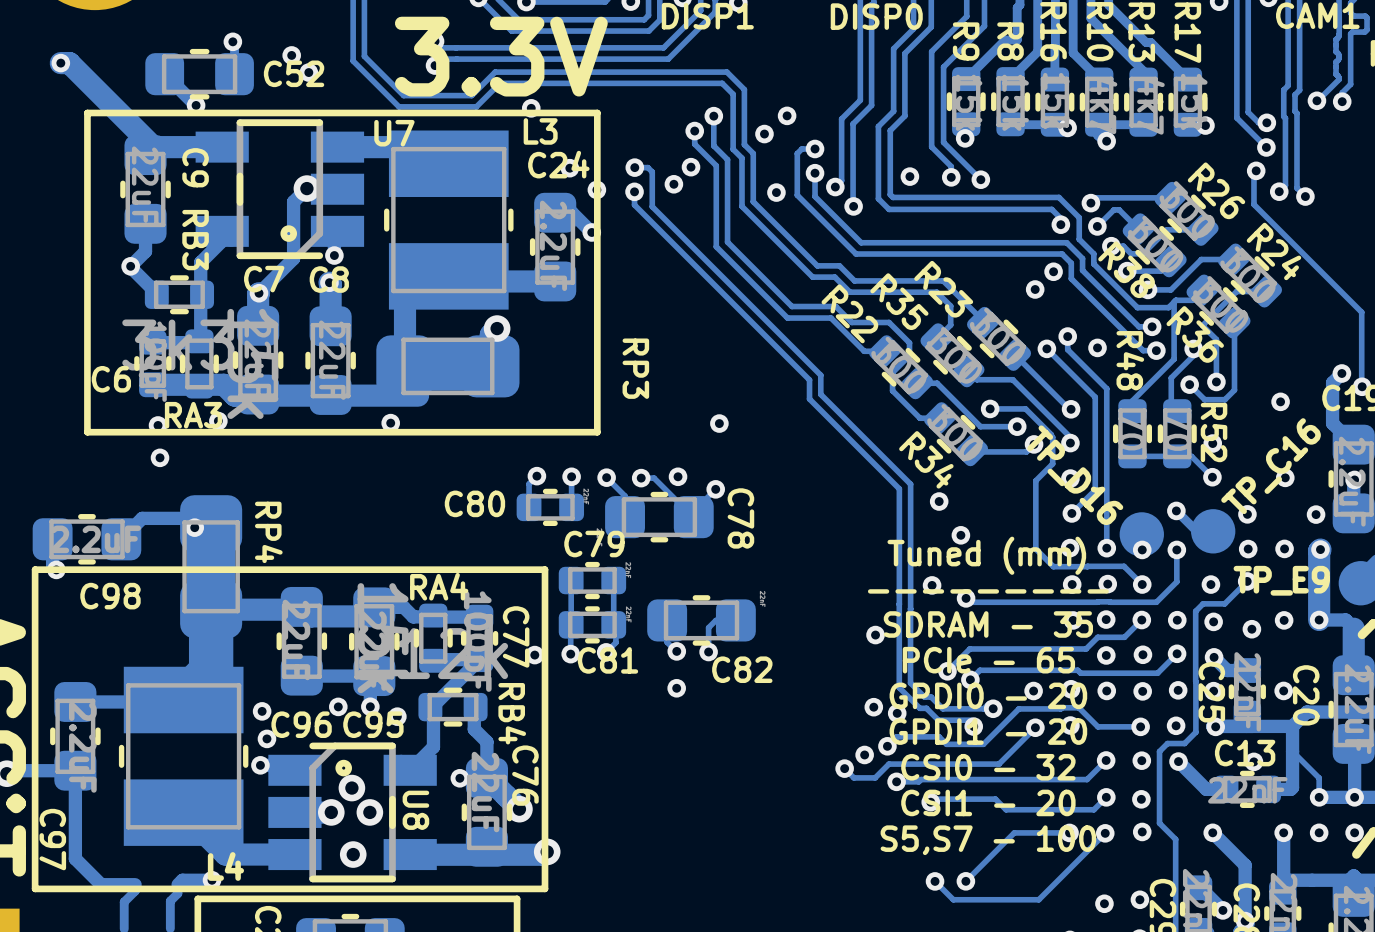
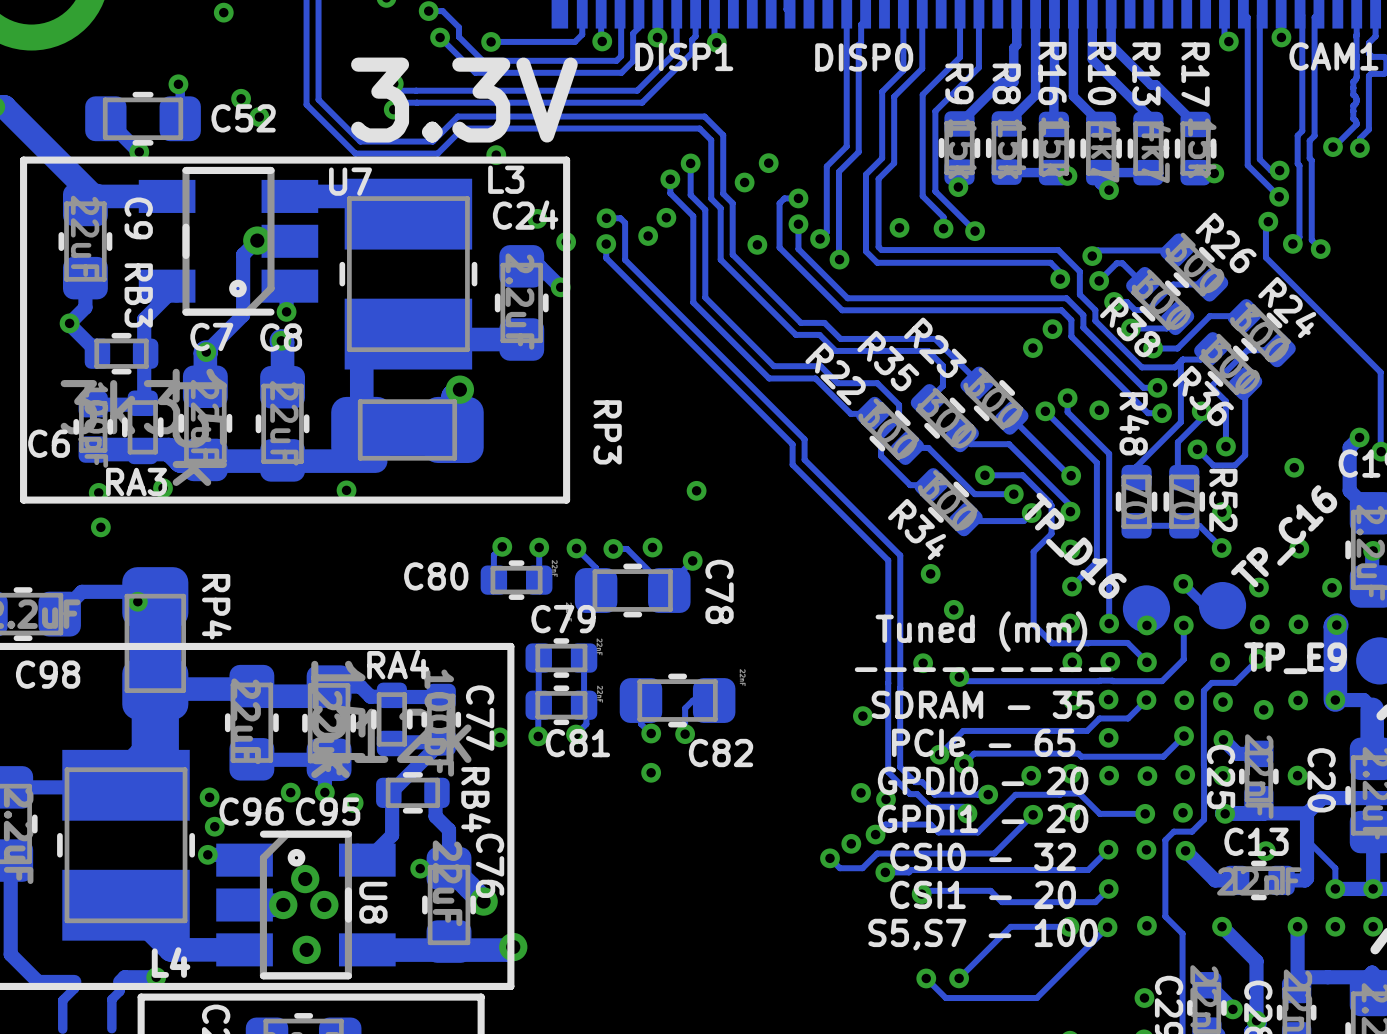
via: (1142, 654) -> none
via: (1141, 799) -> none
via: (1104, 903) -> none

